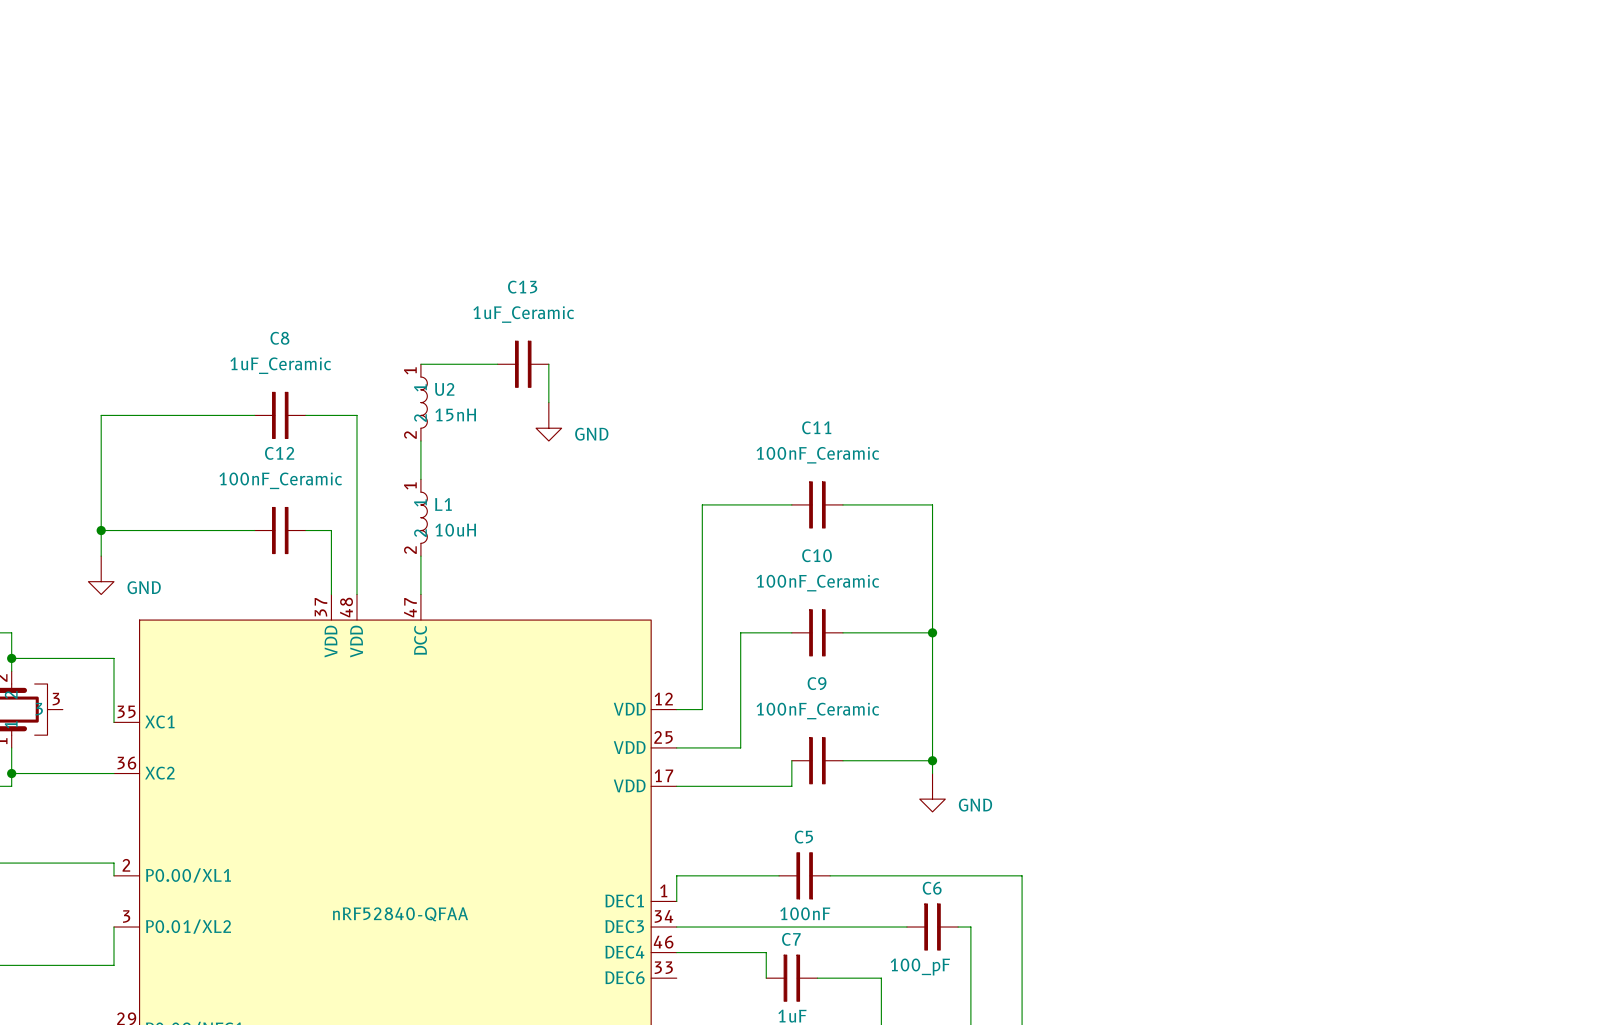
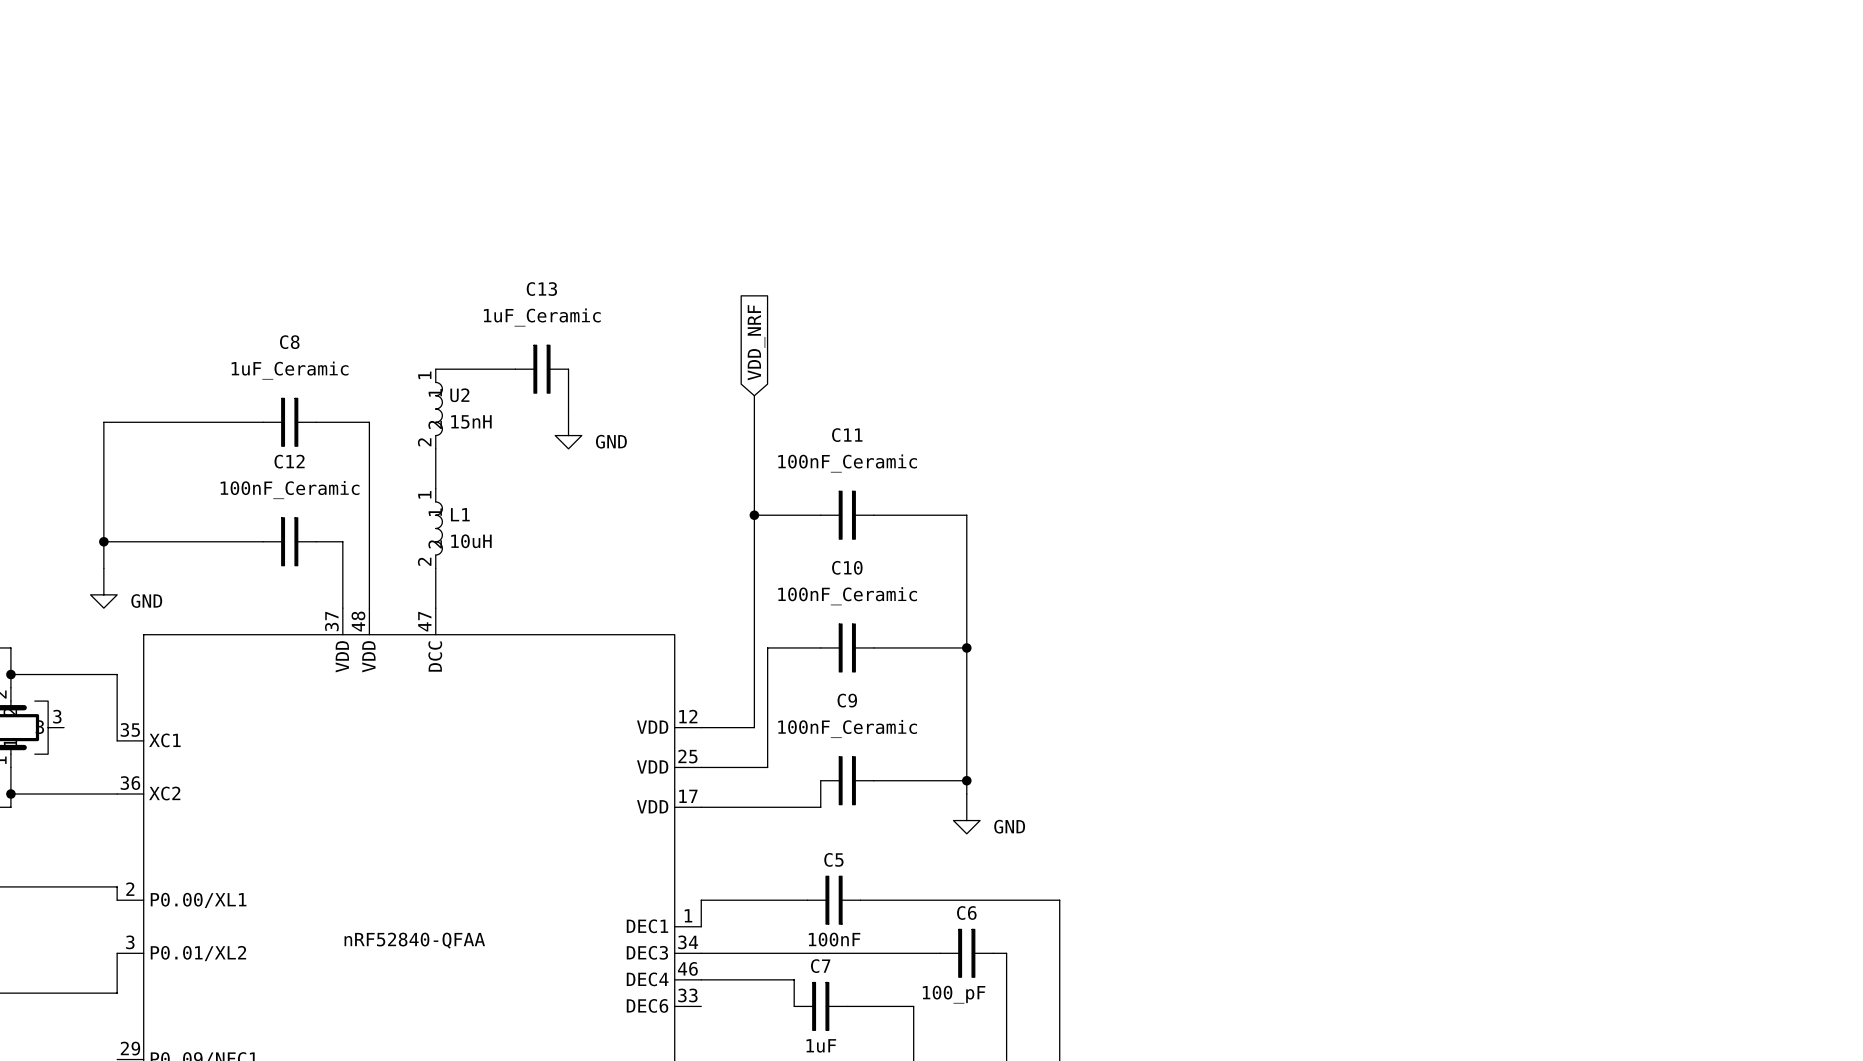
global label: none -> VDD_NRF (756, 342)
wire: (727, 504) (702, 504) (702, 709) -> (754, 395) (754, 727) (727, 727)
junction: none -> (754, 515)

